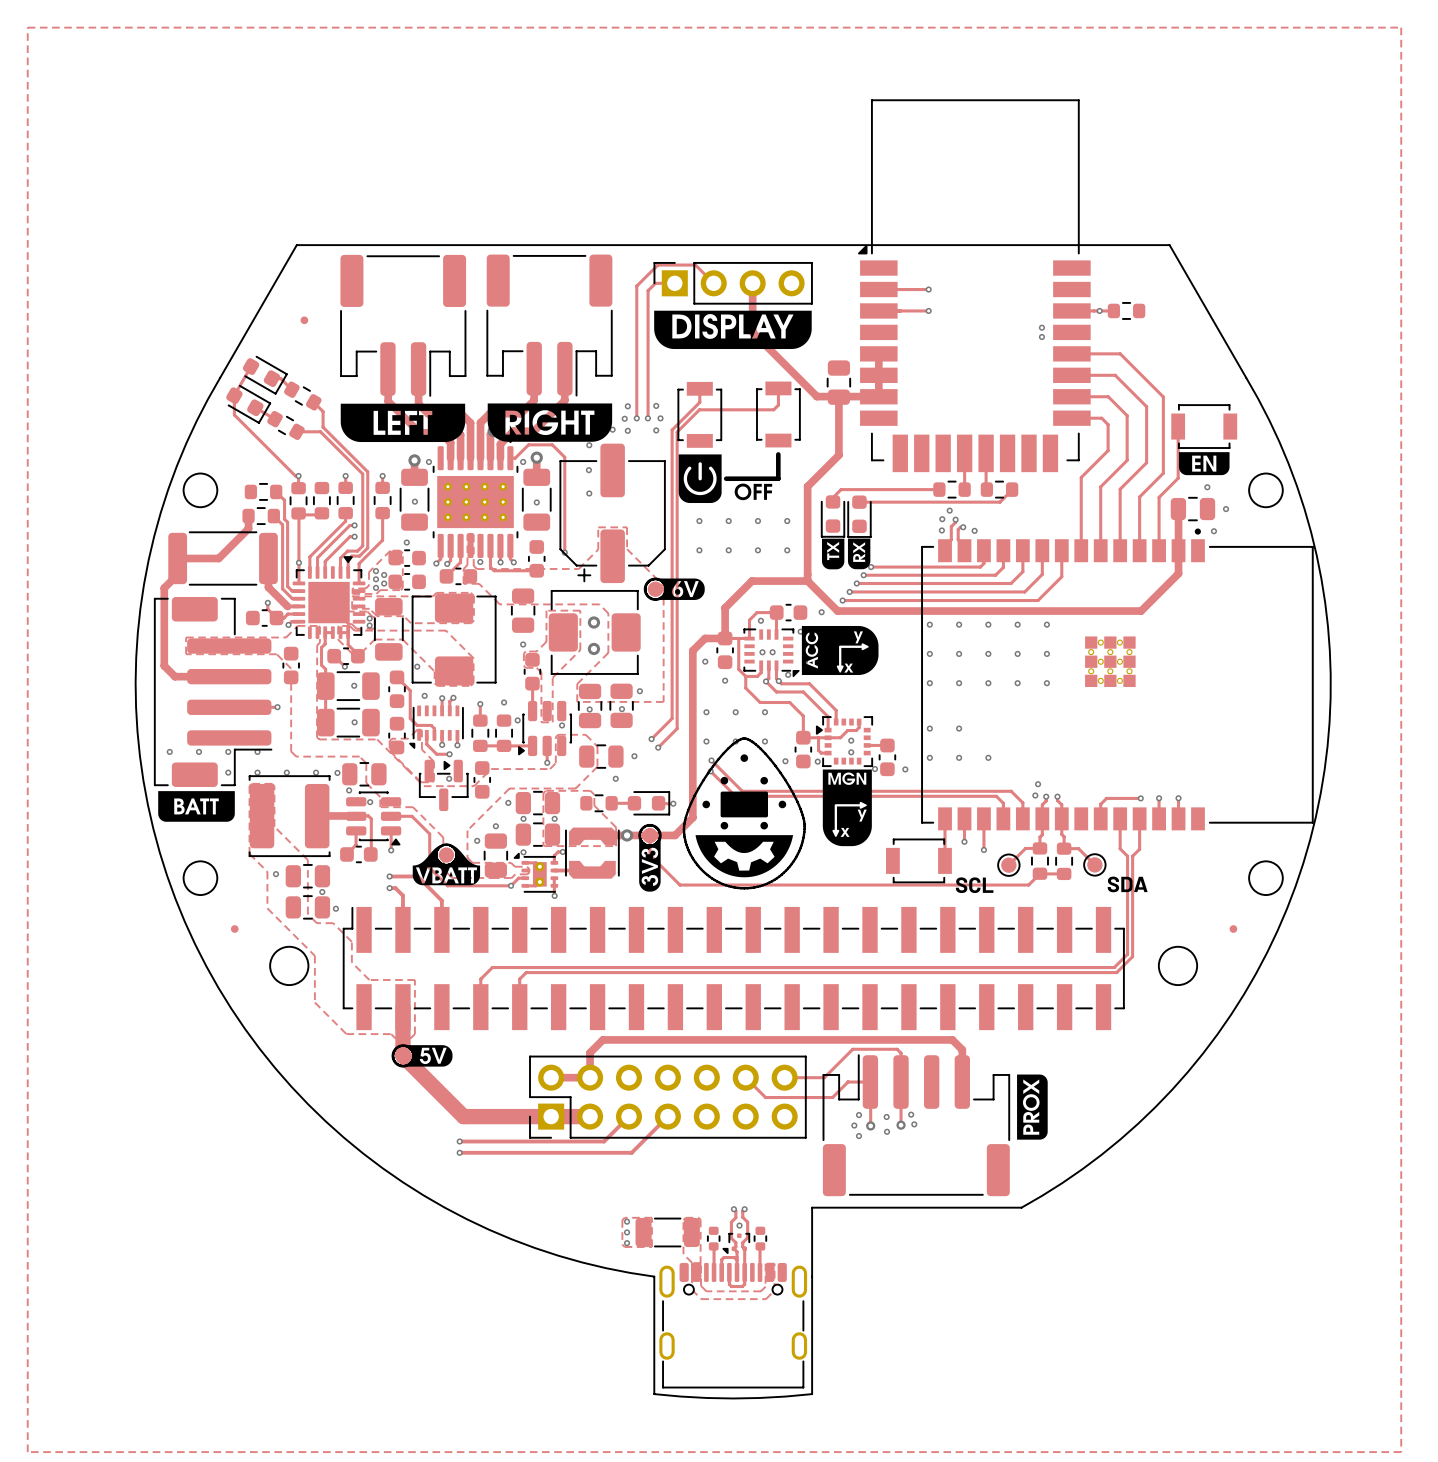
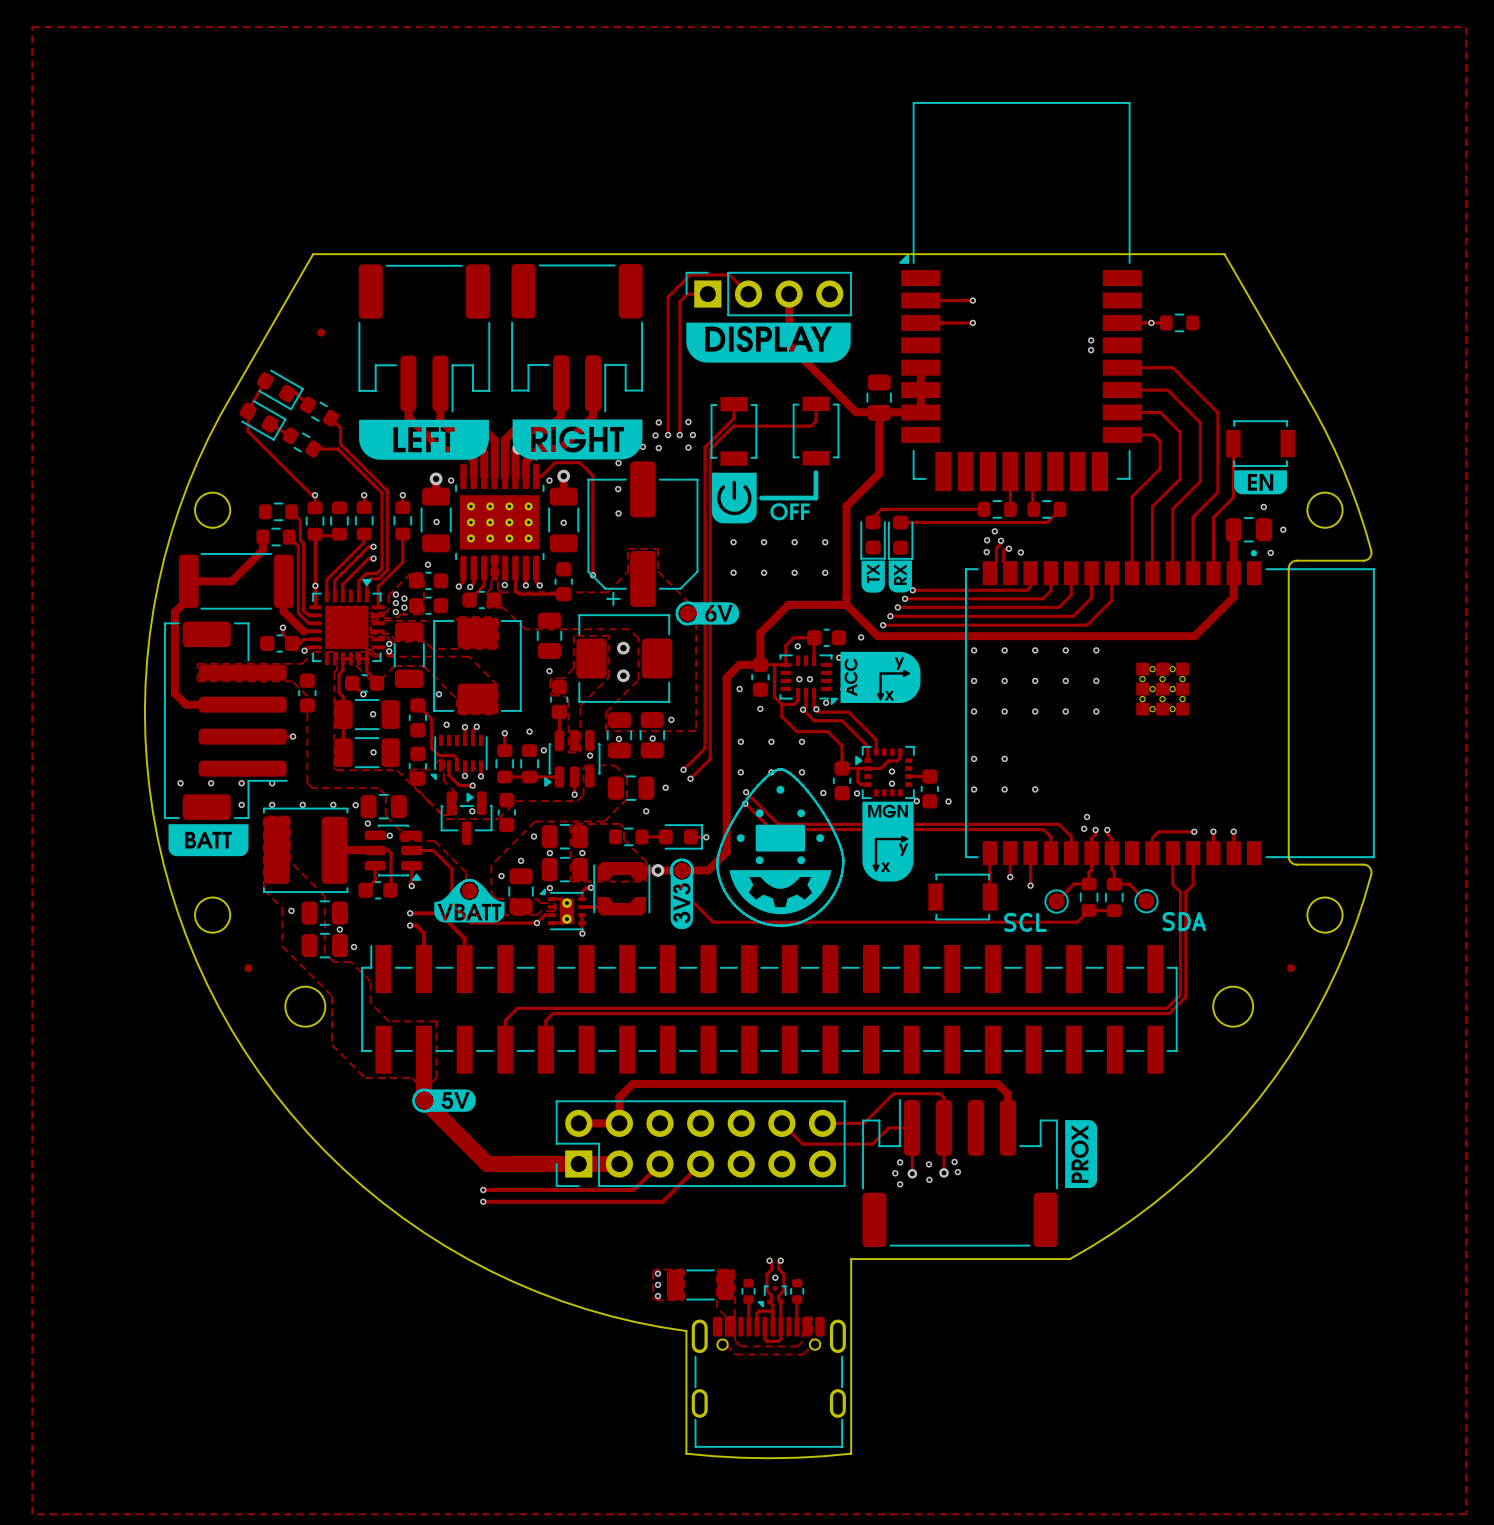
board edge: (1246, 377) (1279, 441) (1297, 486) (1311, 532) (1325, 602) (1330, 674) (1329, 722) (1320, 793) (1310, 840) (1295, 886) (1267, 952) (1244, 994) (1203, 1053) (1155, 1107) (1120, 1139) (1062, 1182) (1021, 1207) -> (1304, 392) (1343, 469) (1358, 509) (1371, 553) (1369, 558) (1364, 560) (1295, 560) (1288, 566) (1288, 857) (1291, 862) (1295, 864) (1365, 864) (1370, 868) (1371, 874) (1356, 922) (1326, 991) (1302, 1035) (1259, 1097) (1227, 1135) (1172, 1187) (1112, 1233) (1069, 1259)

